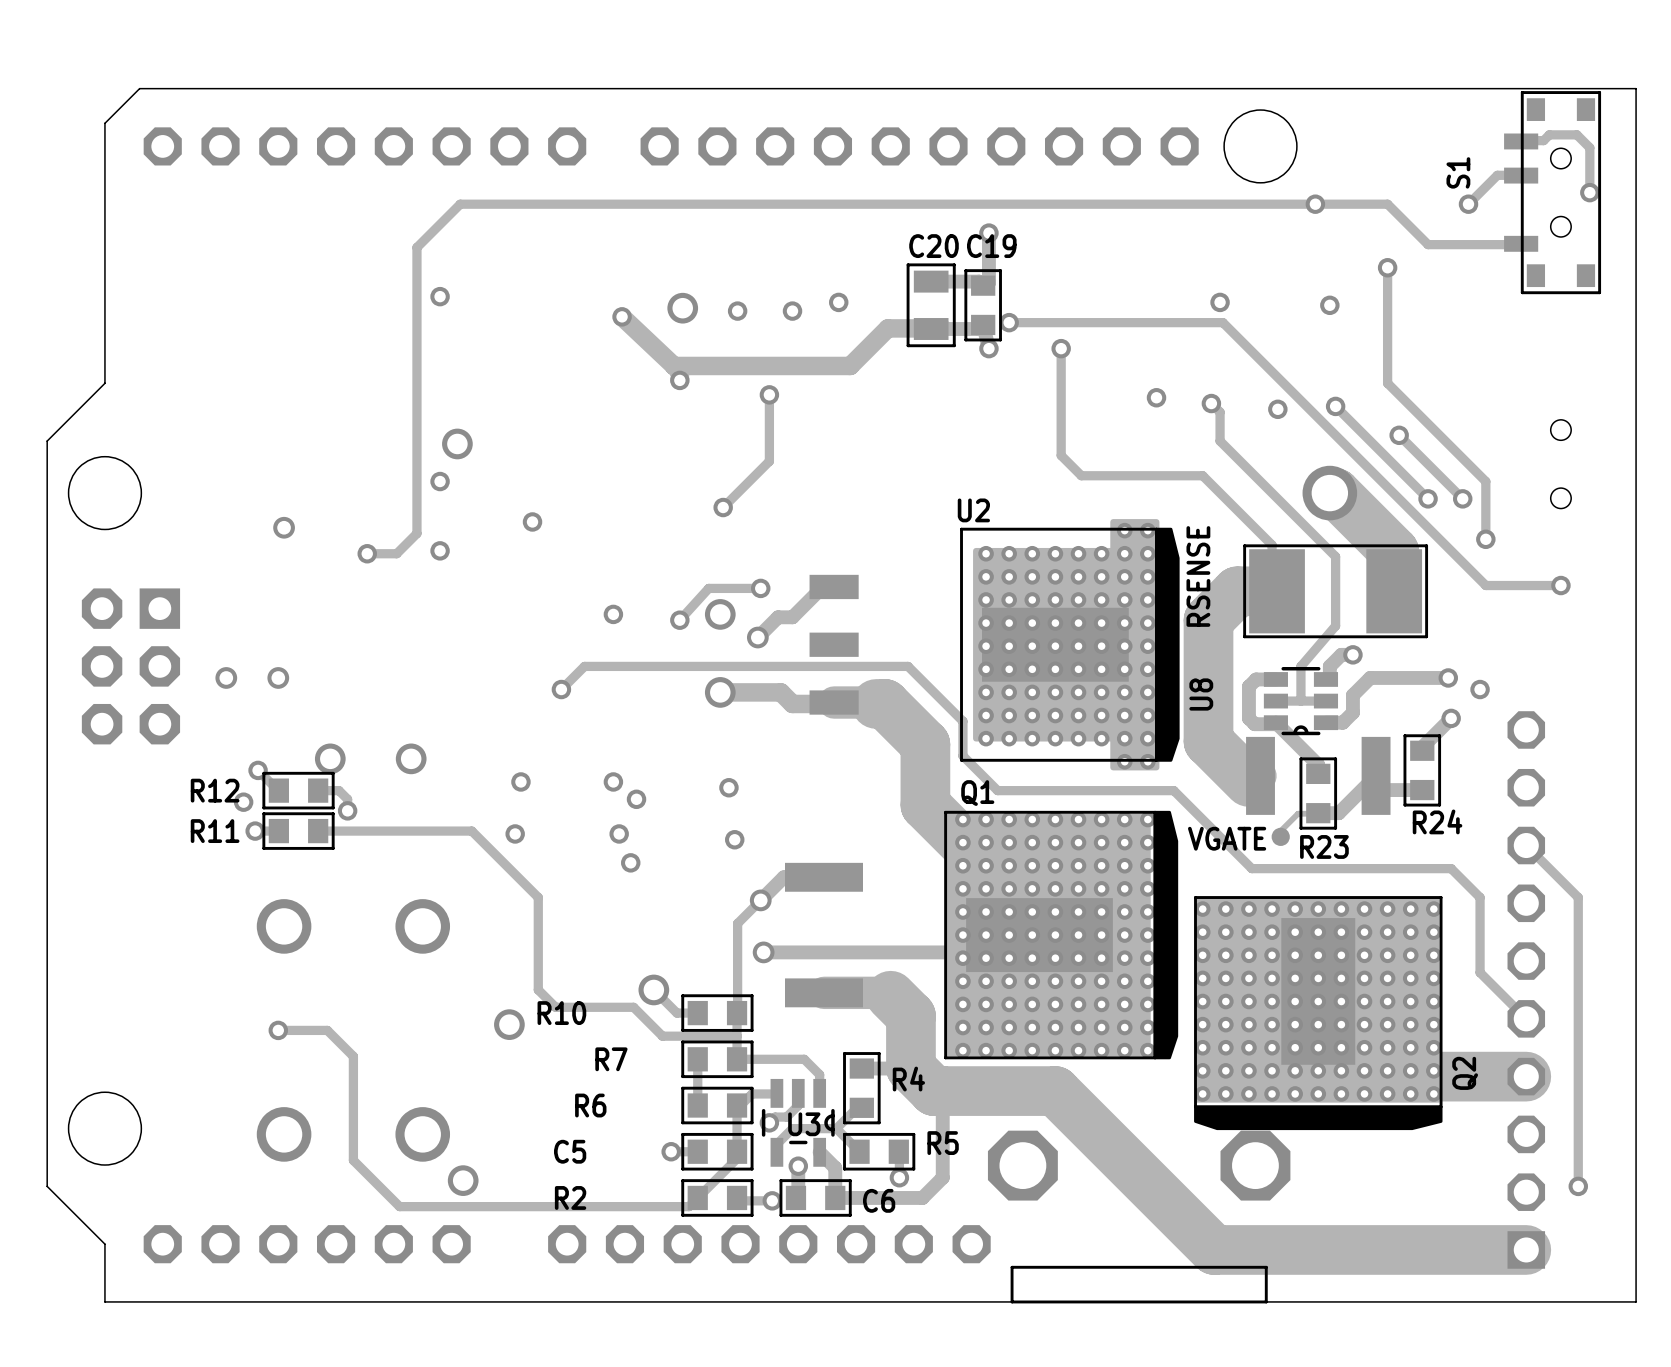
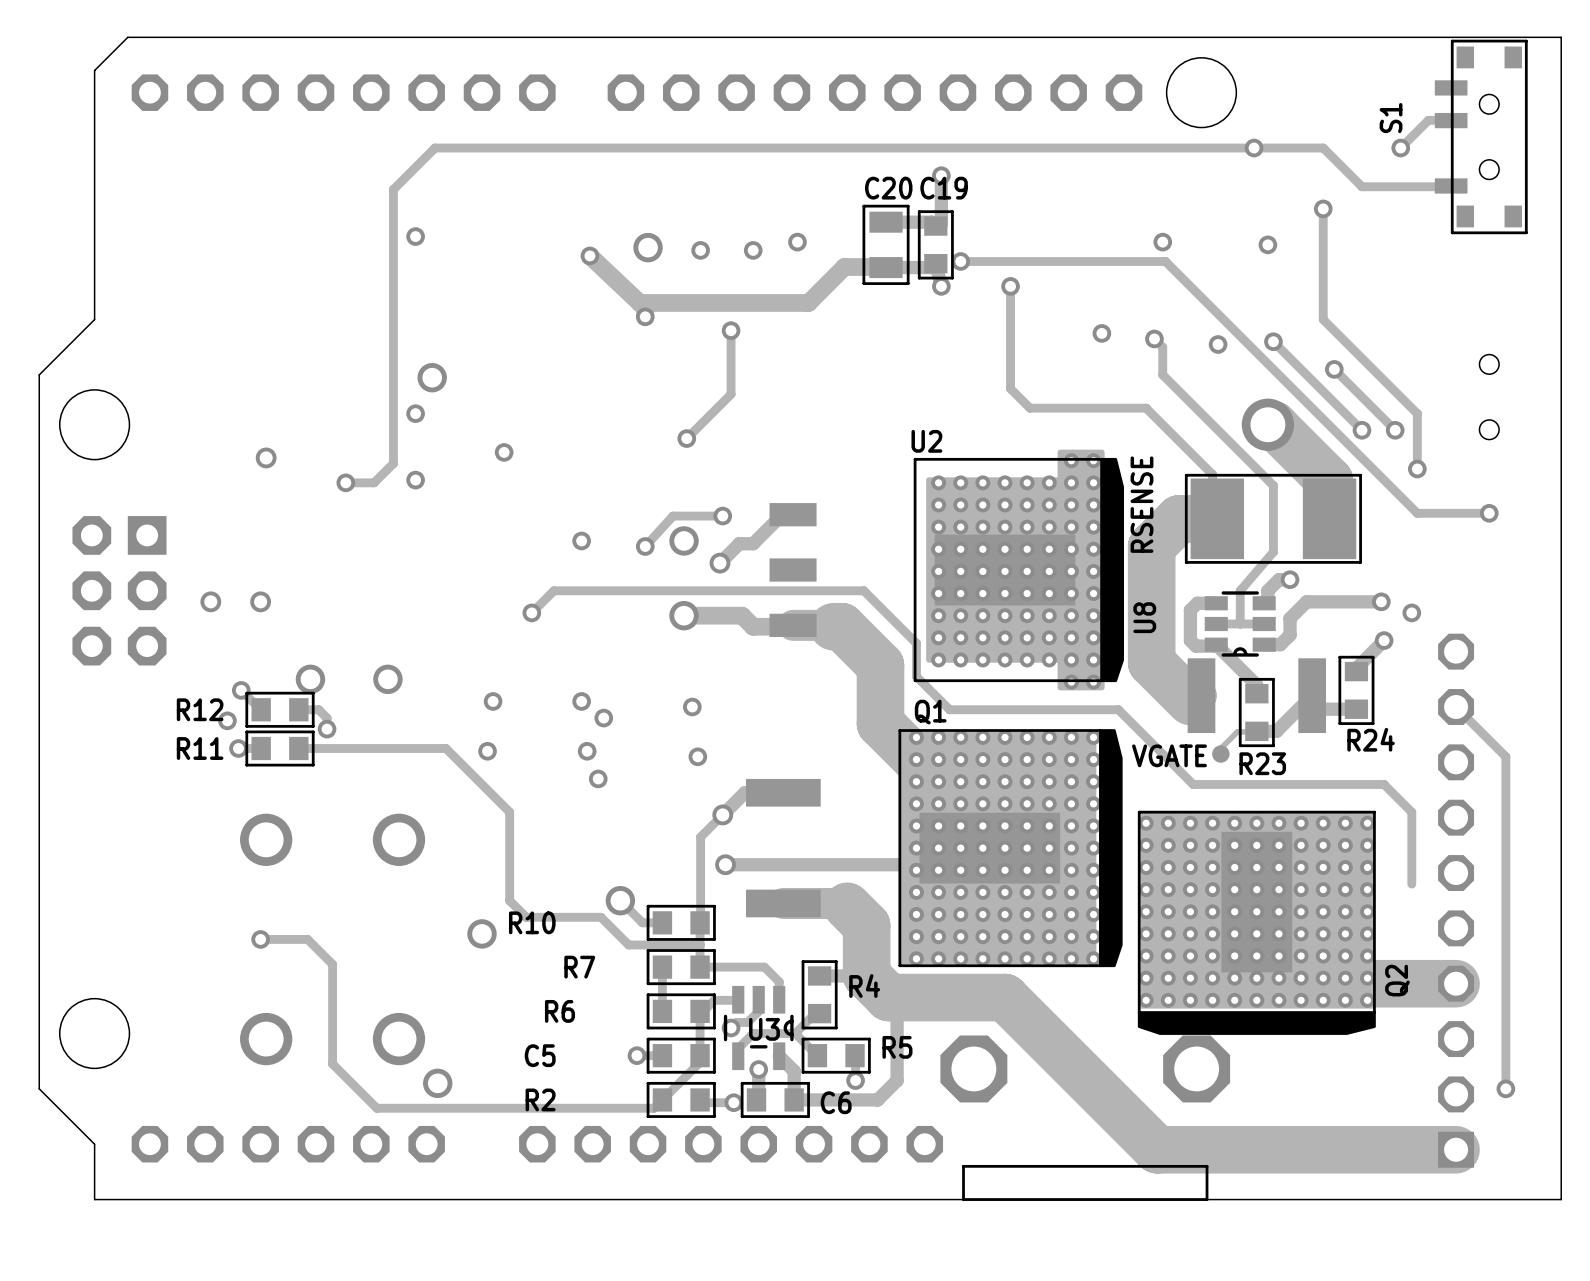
track: (1521, 141) (1543, 140) (1549, 134) (1576, 134) (1589, 147) (1589, 192) -> none
via: (1589, 192) -> none
track: (1526, 845) (1578, 897) -> (1456, 707) (1505, 756) (1505, 812)
track: (1480, 972) (1526, 1018) -> none

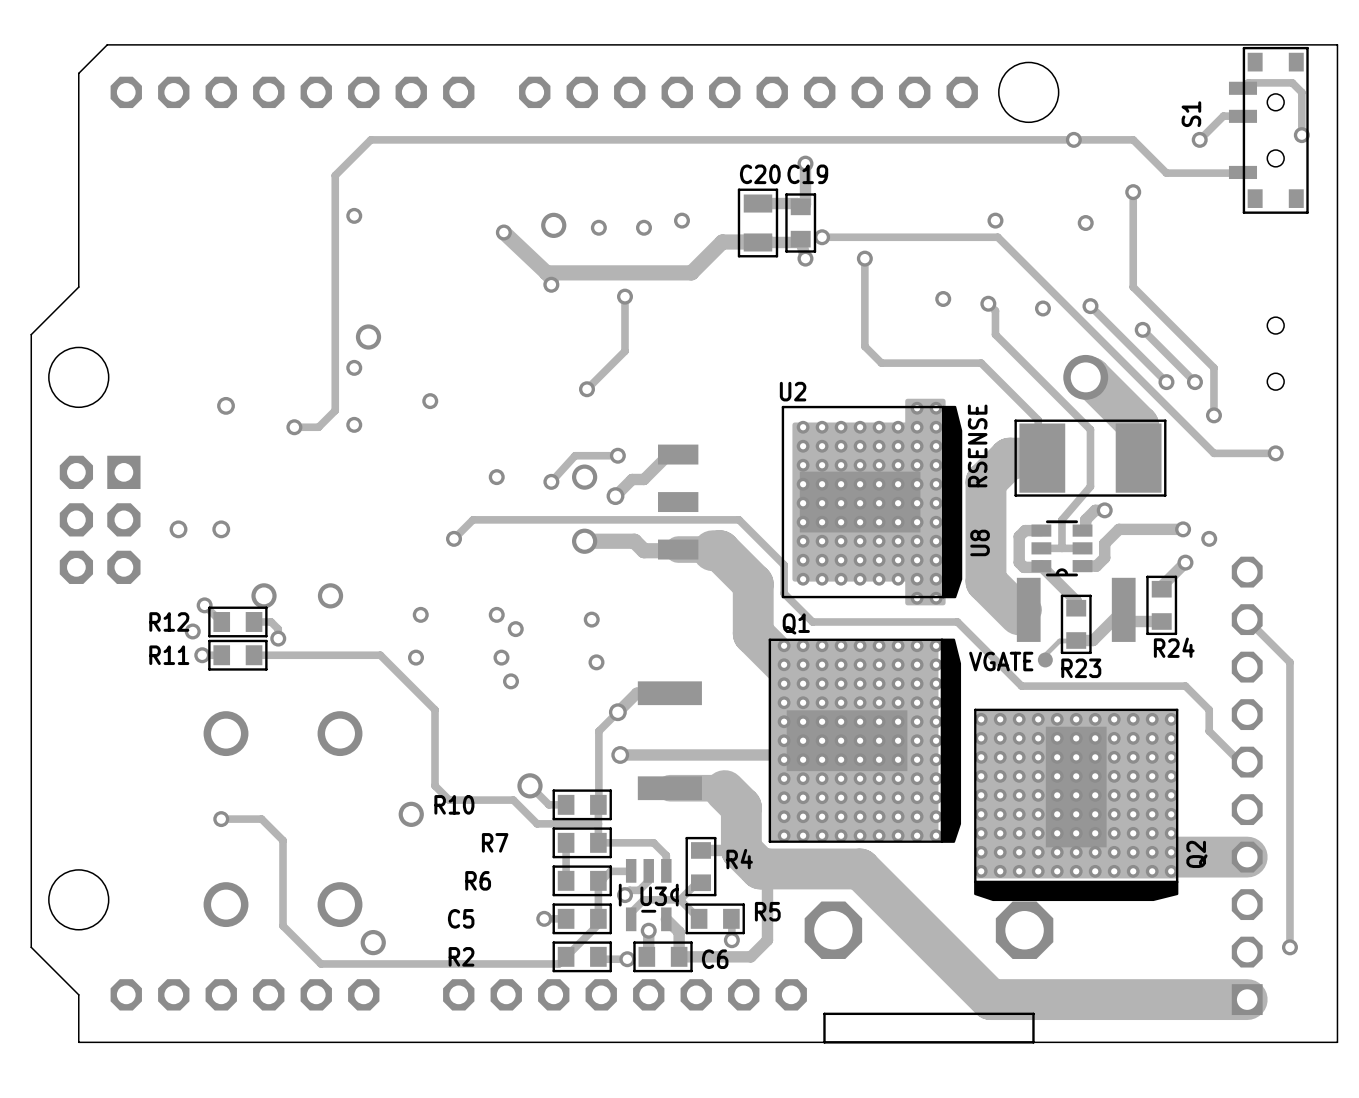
track: none -> (1242, 88) (1248, 82) (1292, 82) (1301, 92) (1301, 135)
via: none -> (1301, 135)
track: (1411, 837) (1411, 884) -> (1209, 731) (1240, 762) (1247, 762)

